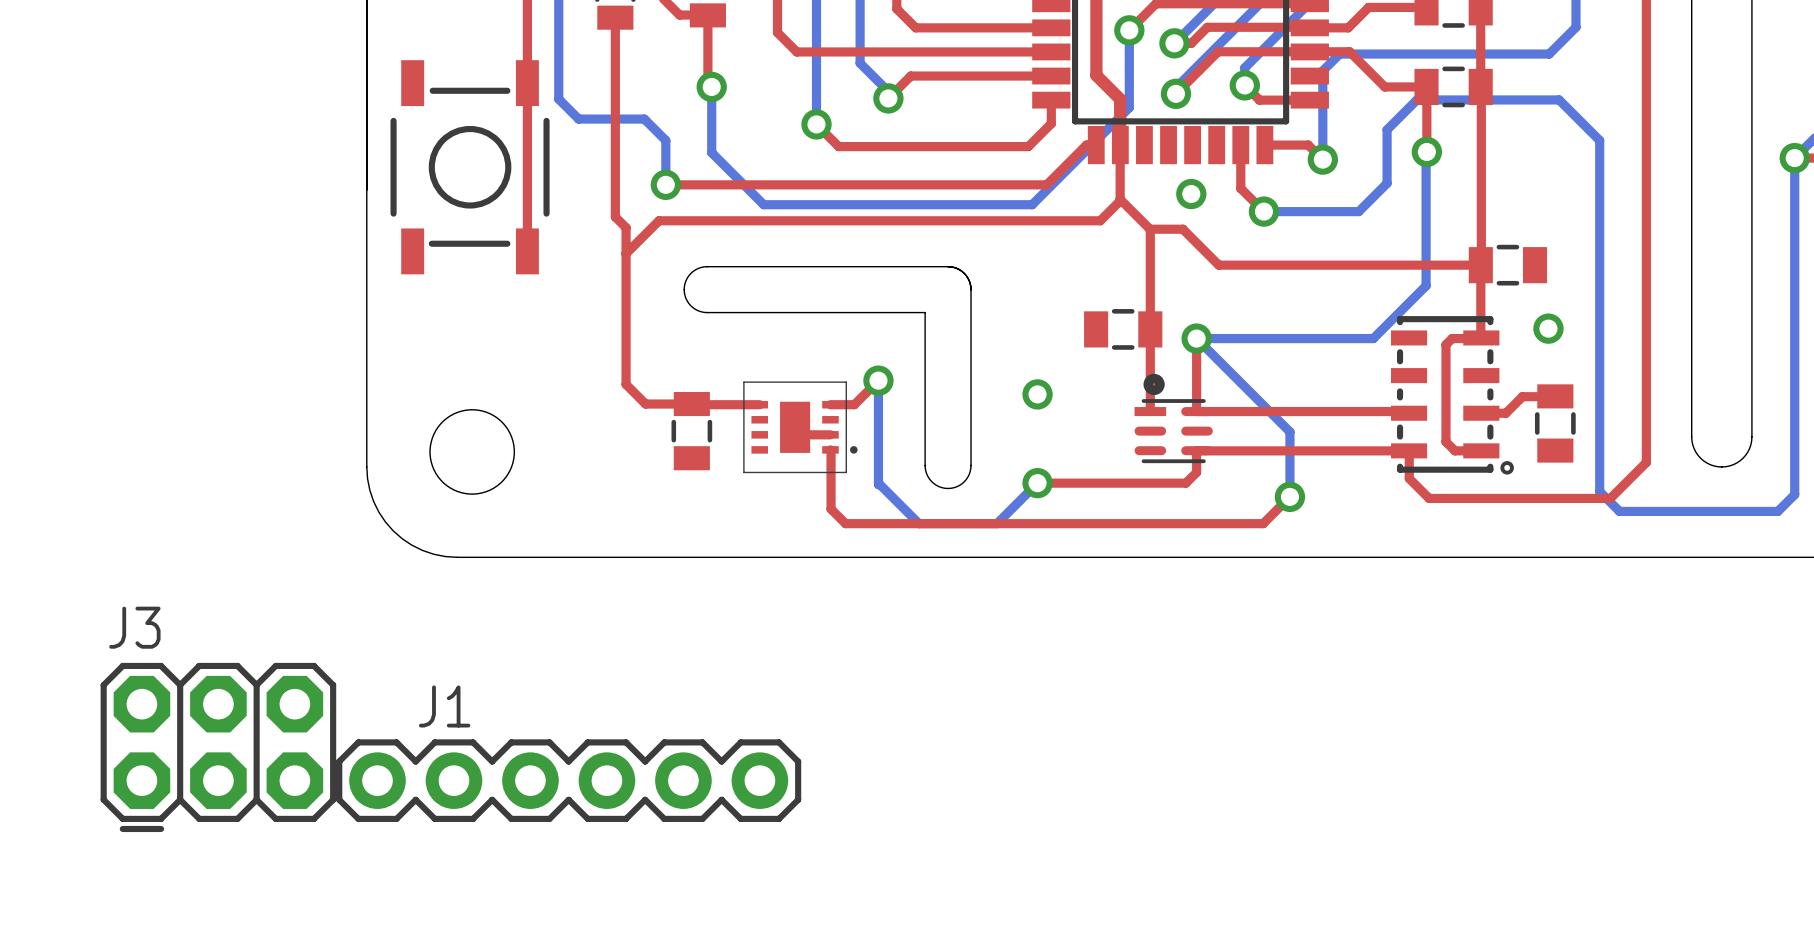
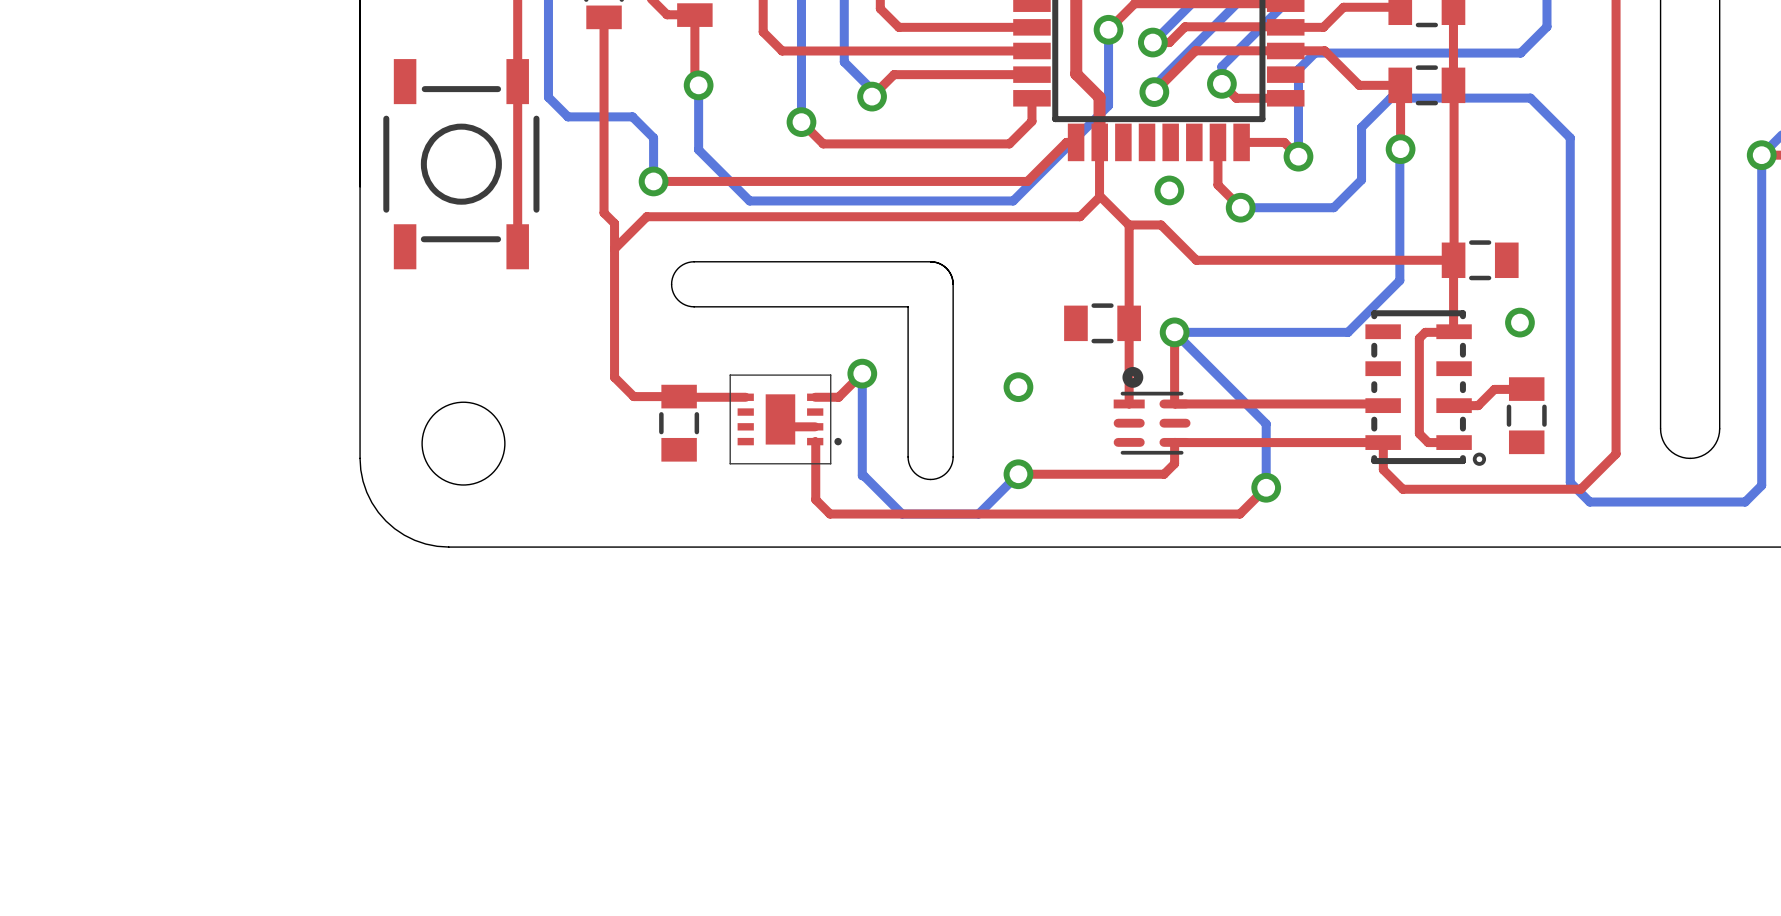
J3: (218, 747) -> none
J1: (568, 780) -> none

